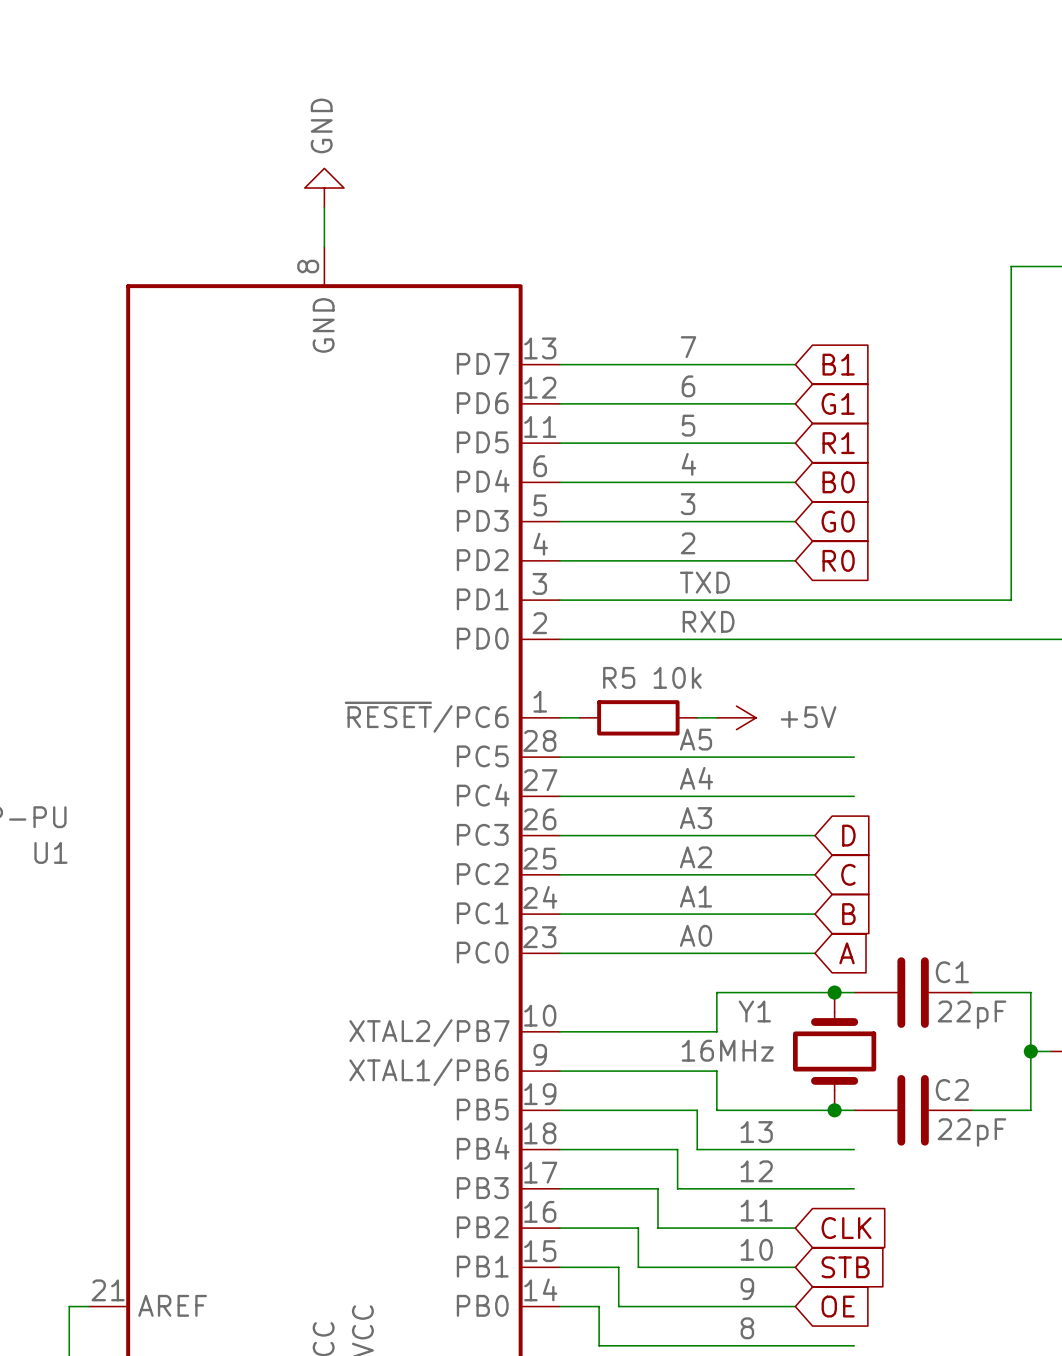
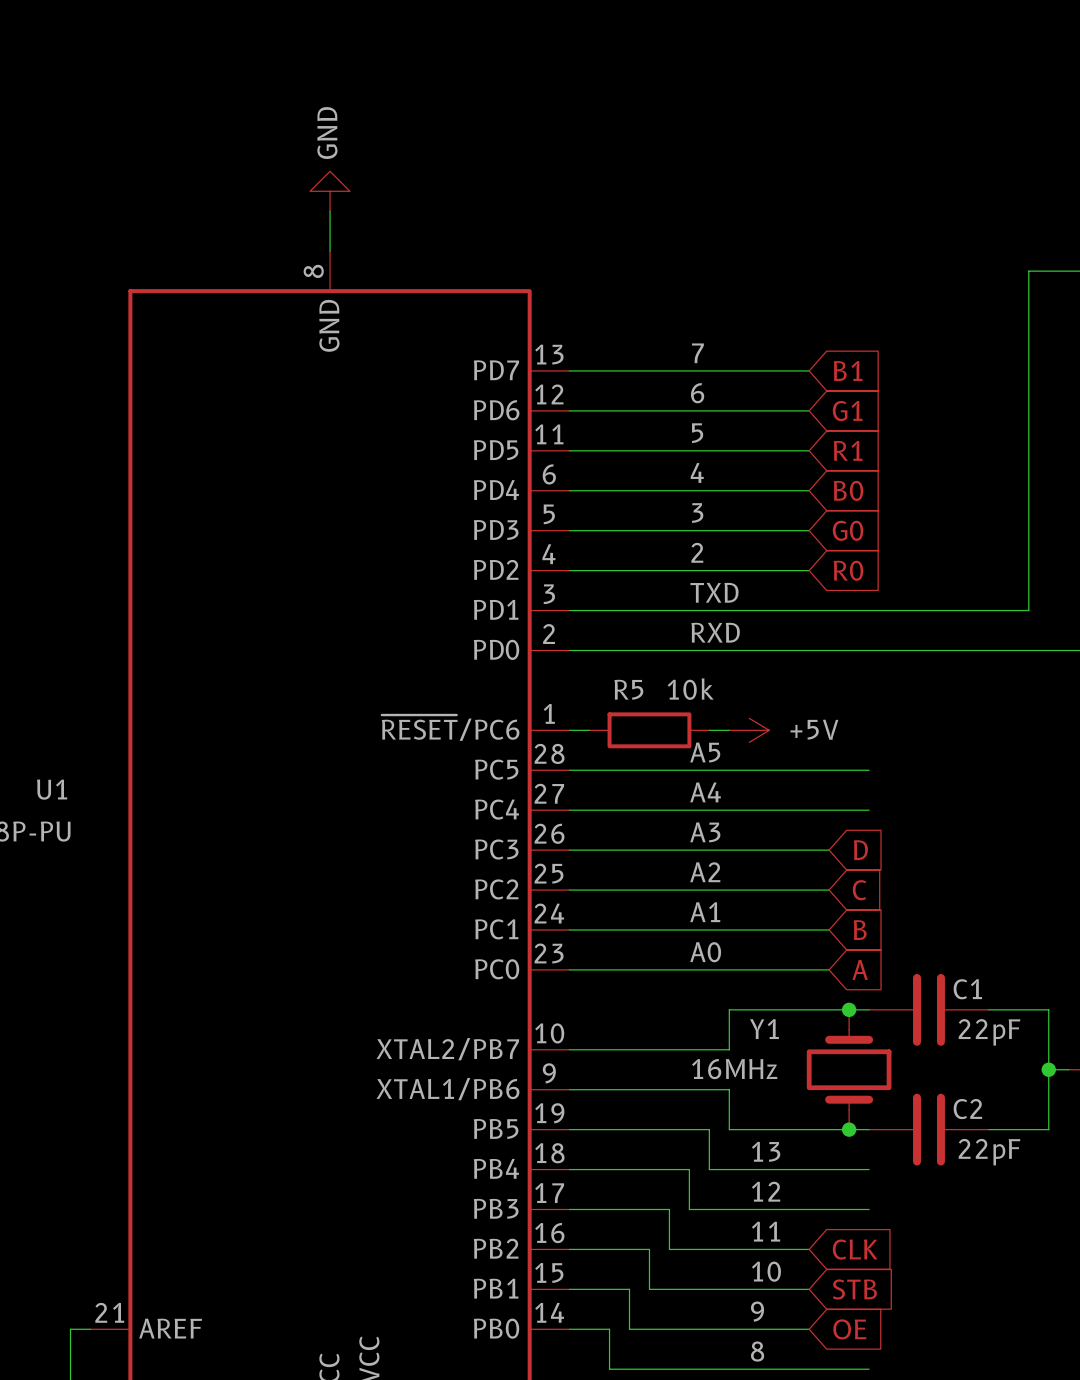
U1 name position: U1 (50, 852) -> U1 (52, 789)

